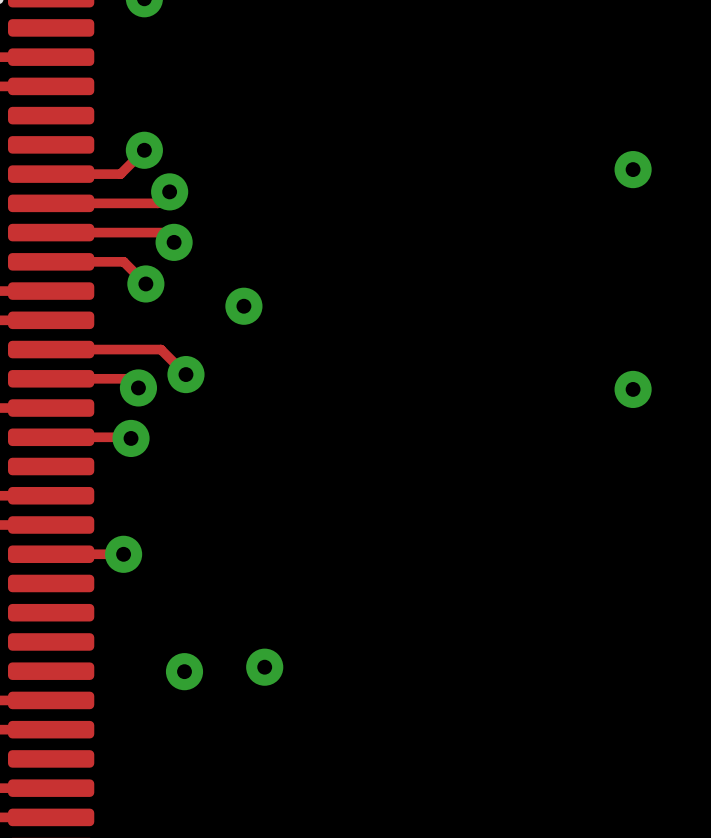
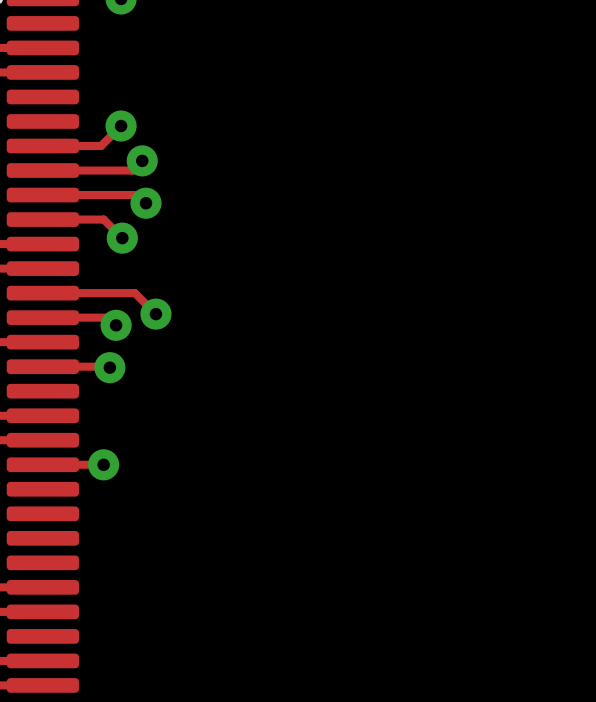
via: (633, 169) -> none
via: (243, 306) -> none
via: (633, 389) -> none
via: (264, 667) -> none
via: (184, 671) -> none

